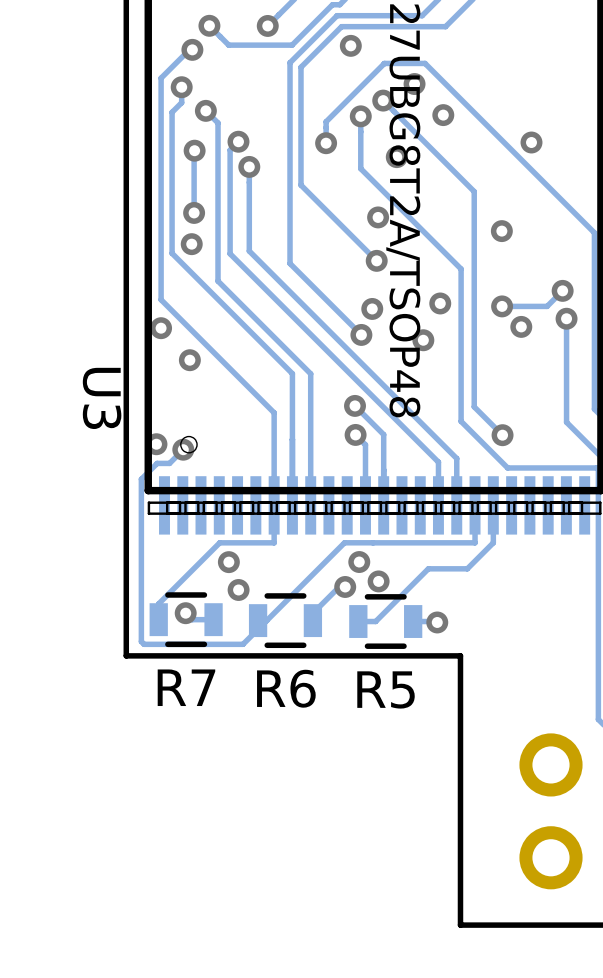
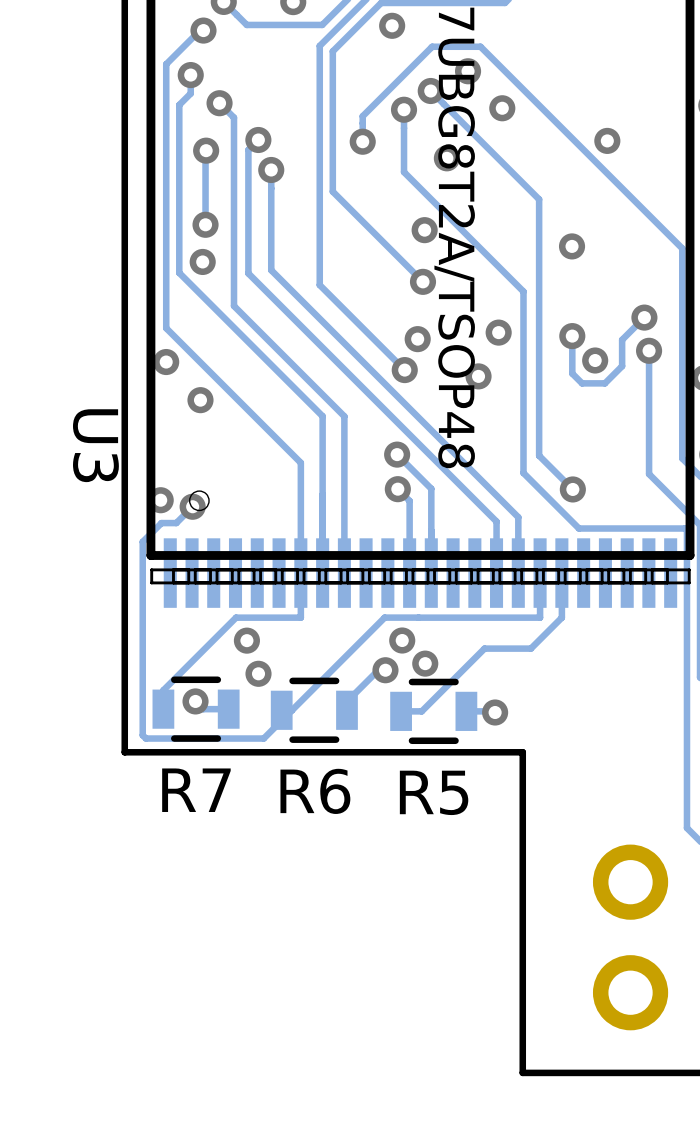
track: (547, 306) (502, 306) -> (625, 336) (622, 339) (622, 366) (604, 383) (582, 383) (572, 373) (572, 336)

